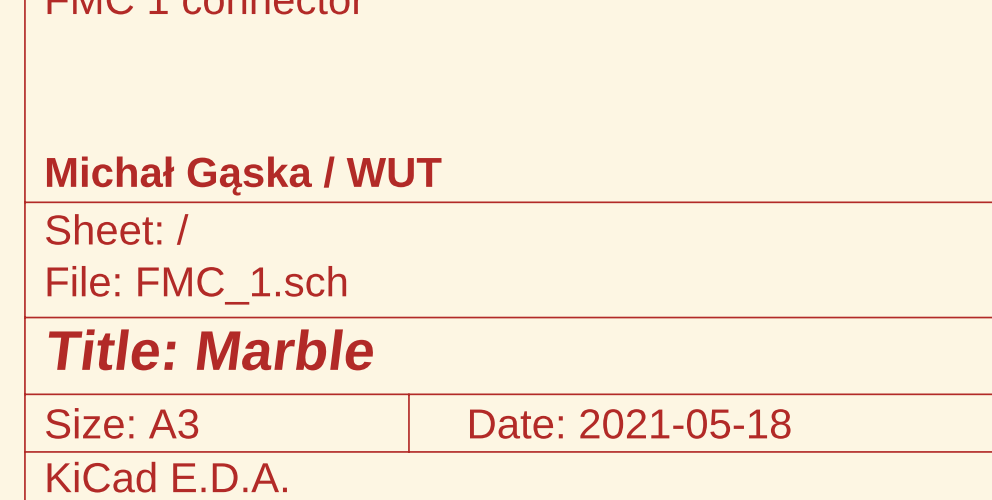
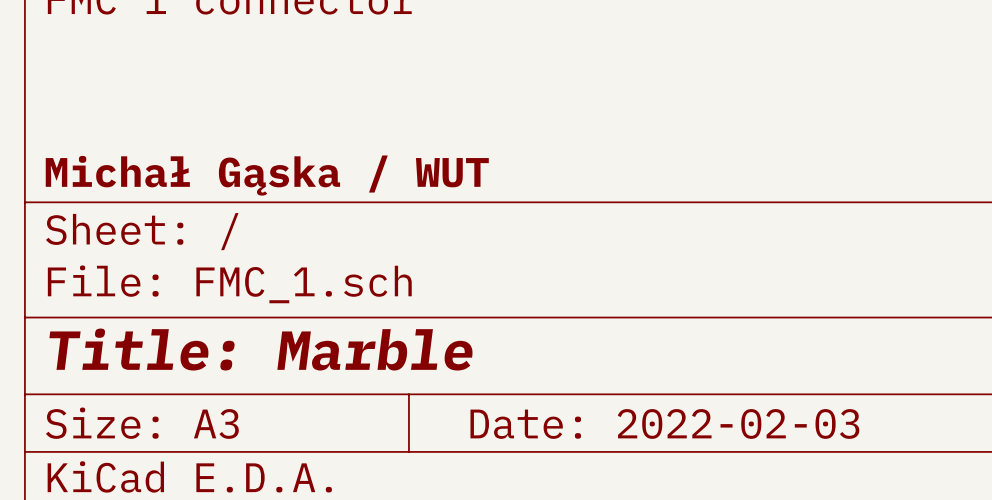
title block: Date: 2021-05-18 (630, 423) -> Date: 2022-02-03 (664, 423)

